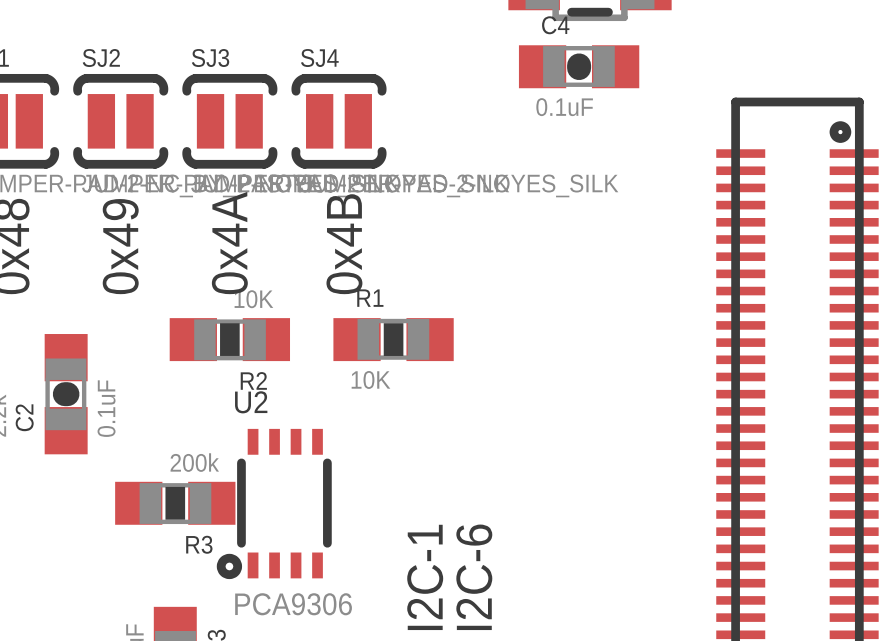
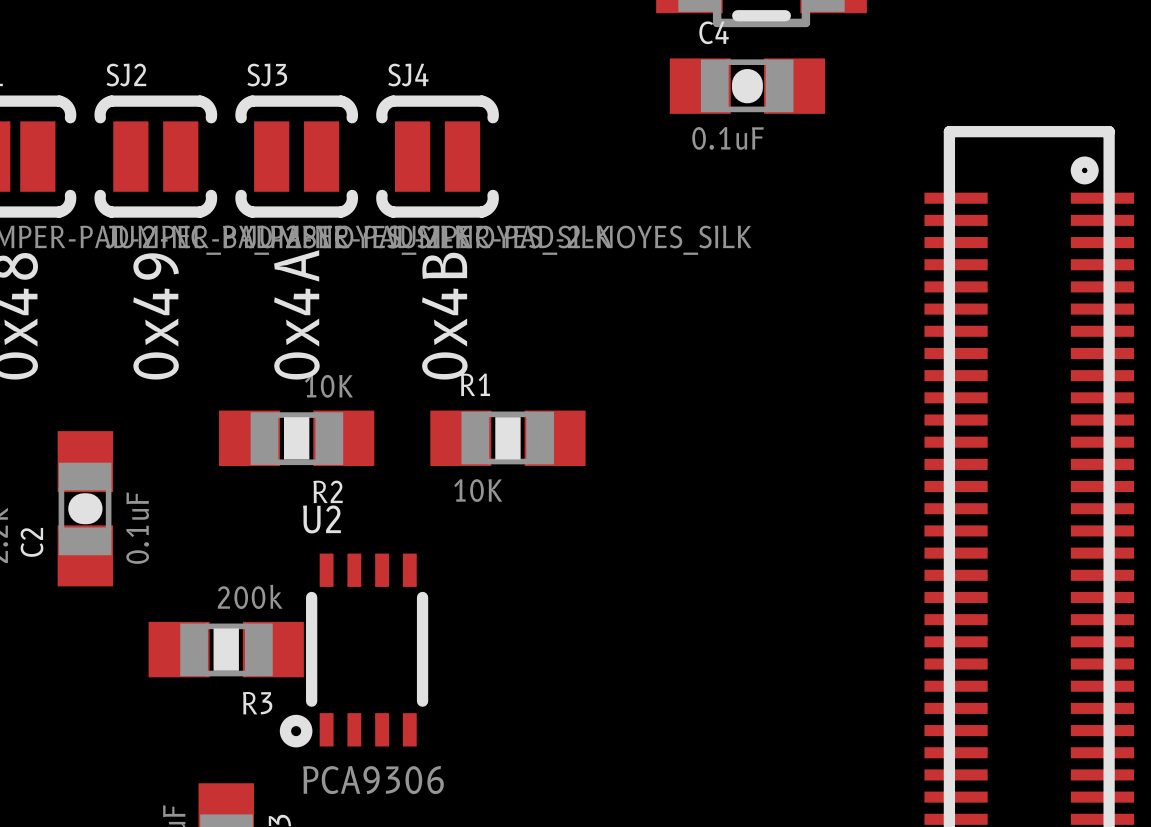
text: I2C-1 (425, 577) -> none
text: I2C-6 (474, 577) -> none

